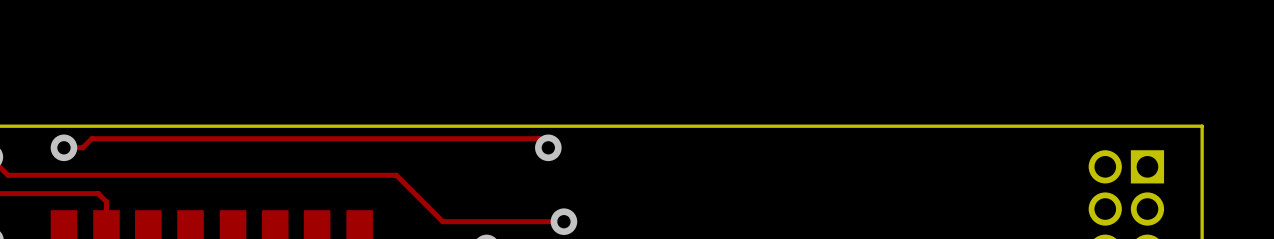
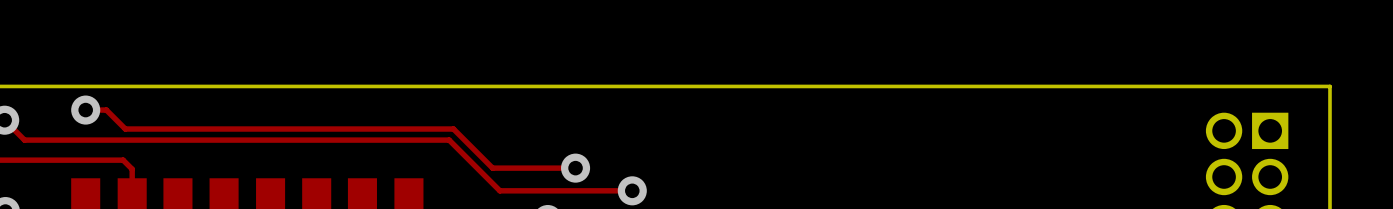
track: (82, 147) (91, 138) (539, 138) (548, 147) -> (106, 110) (125, 129) (453, 129) (492, 168) (575, 168)
via: (548, 147) -> none
via: none -> (575, 168)

